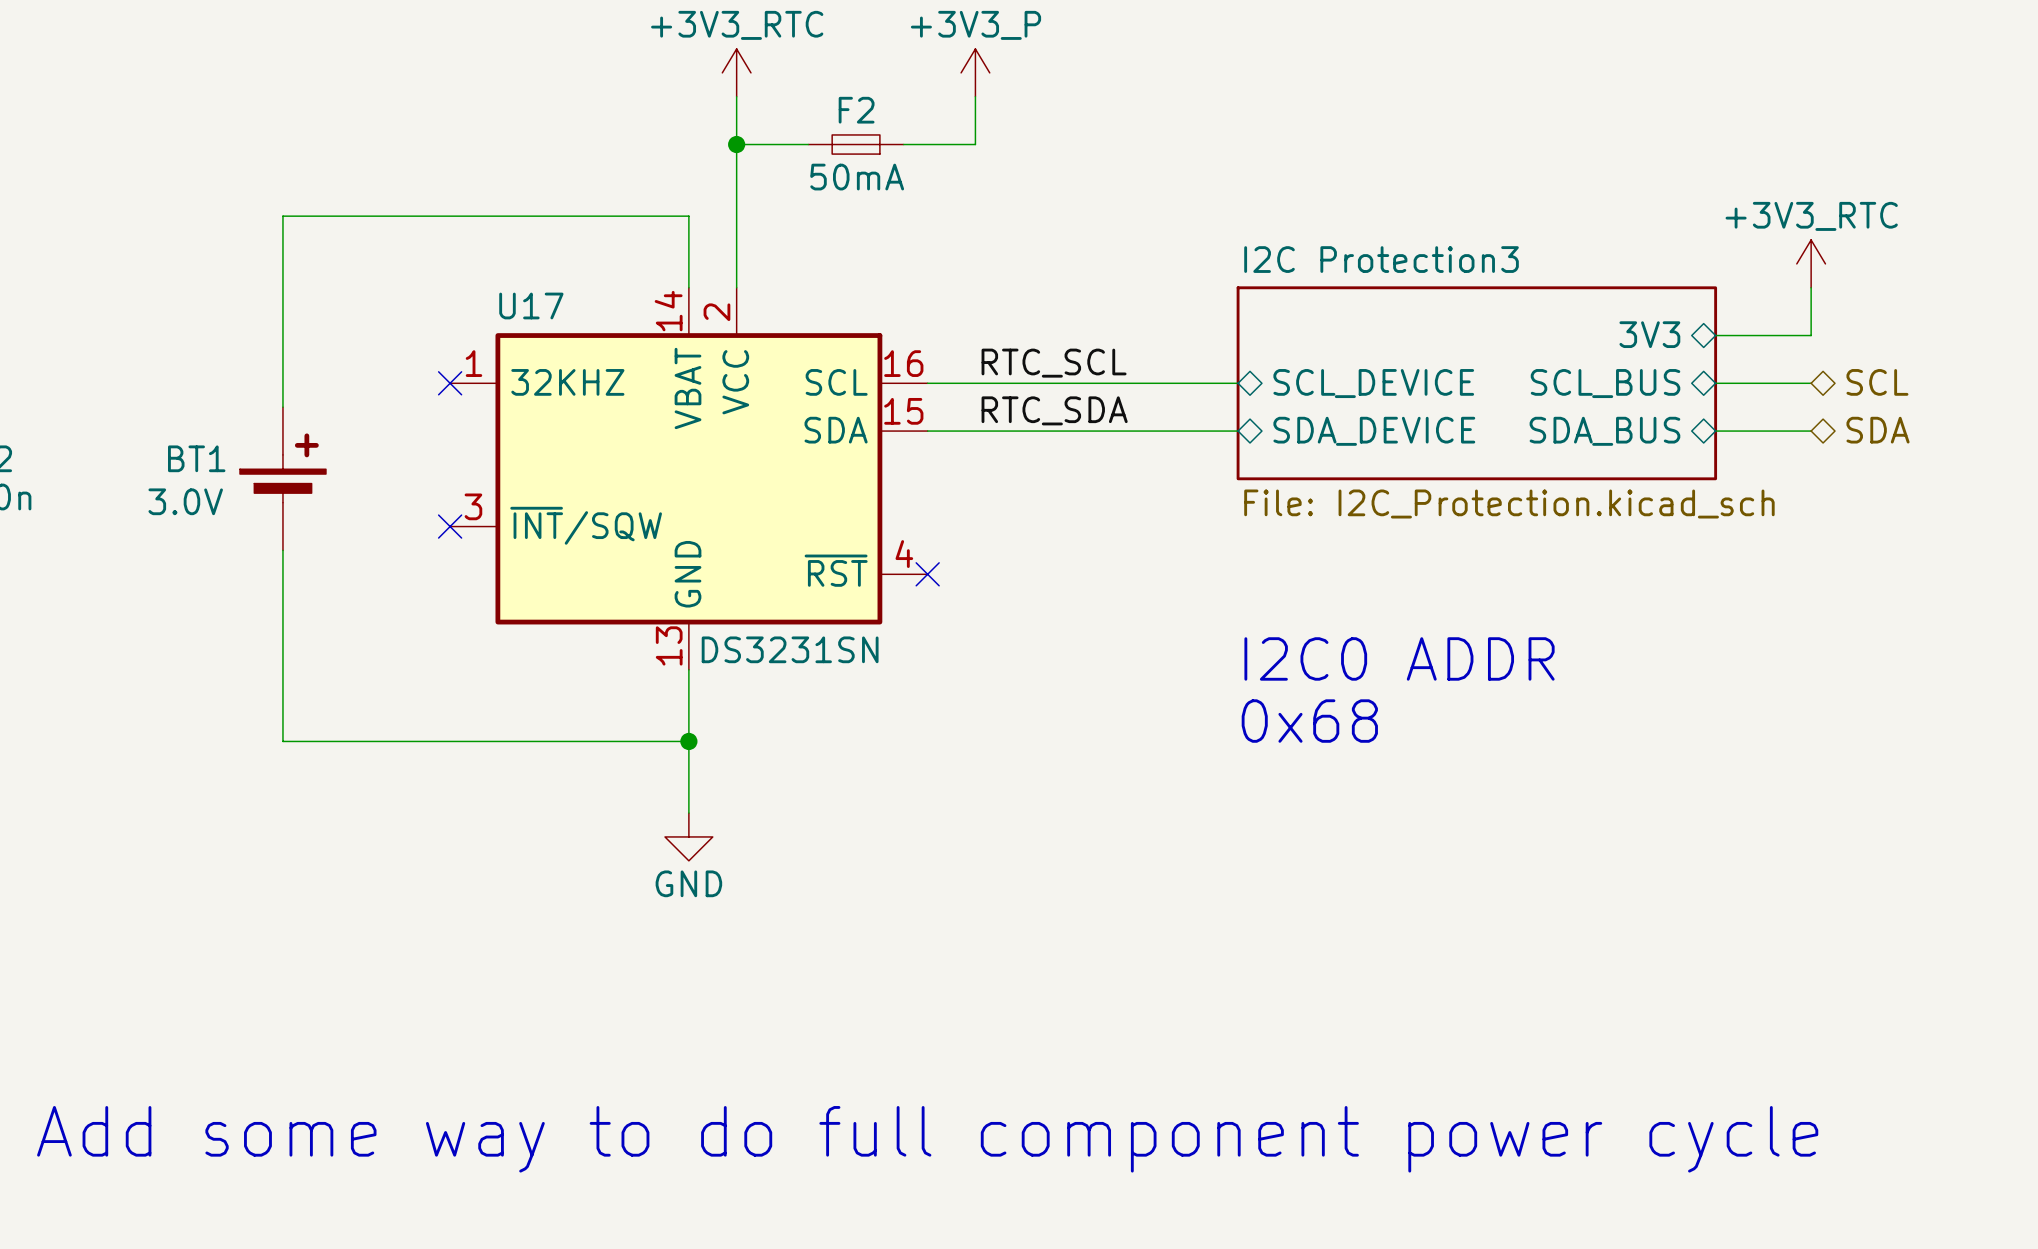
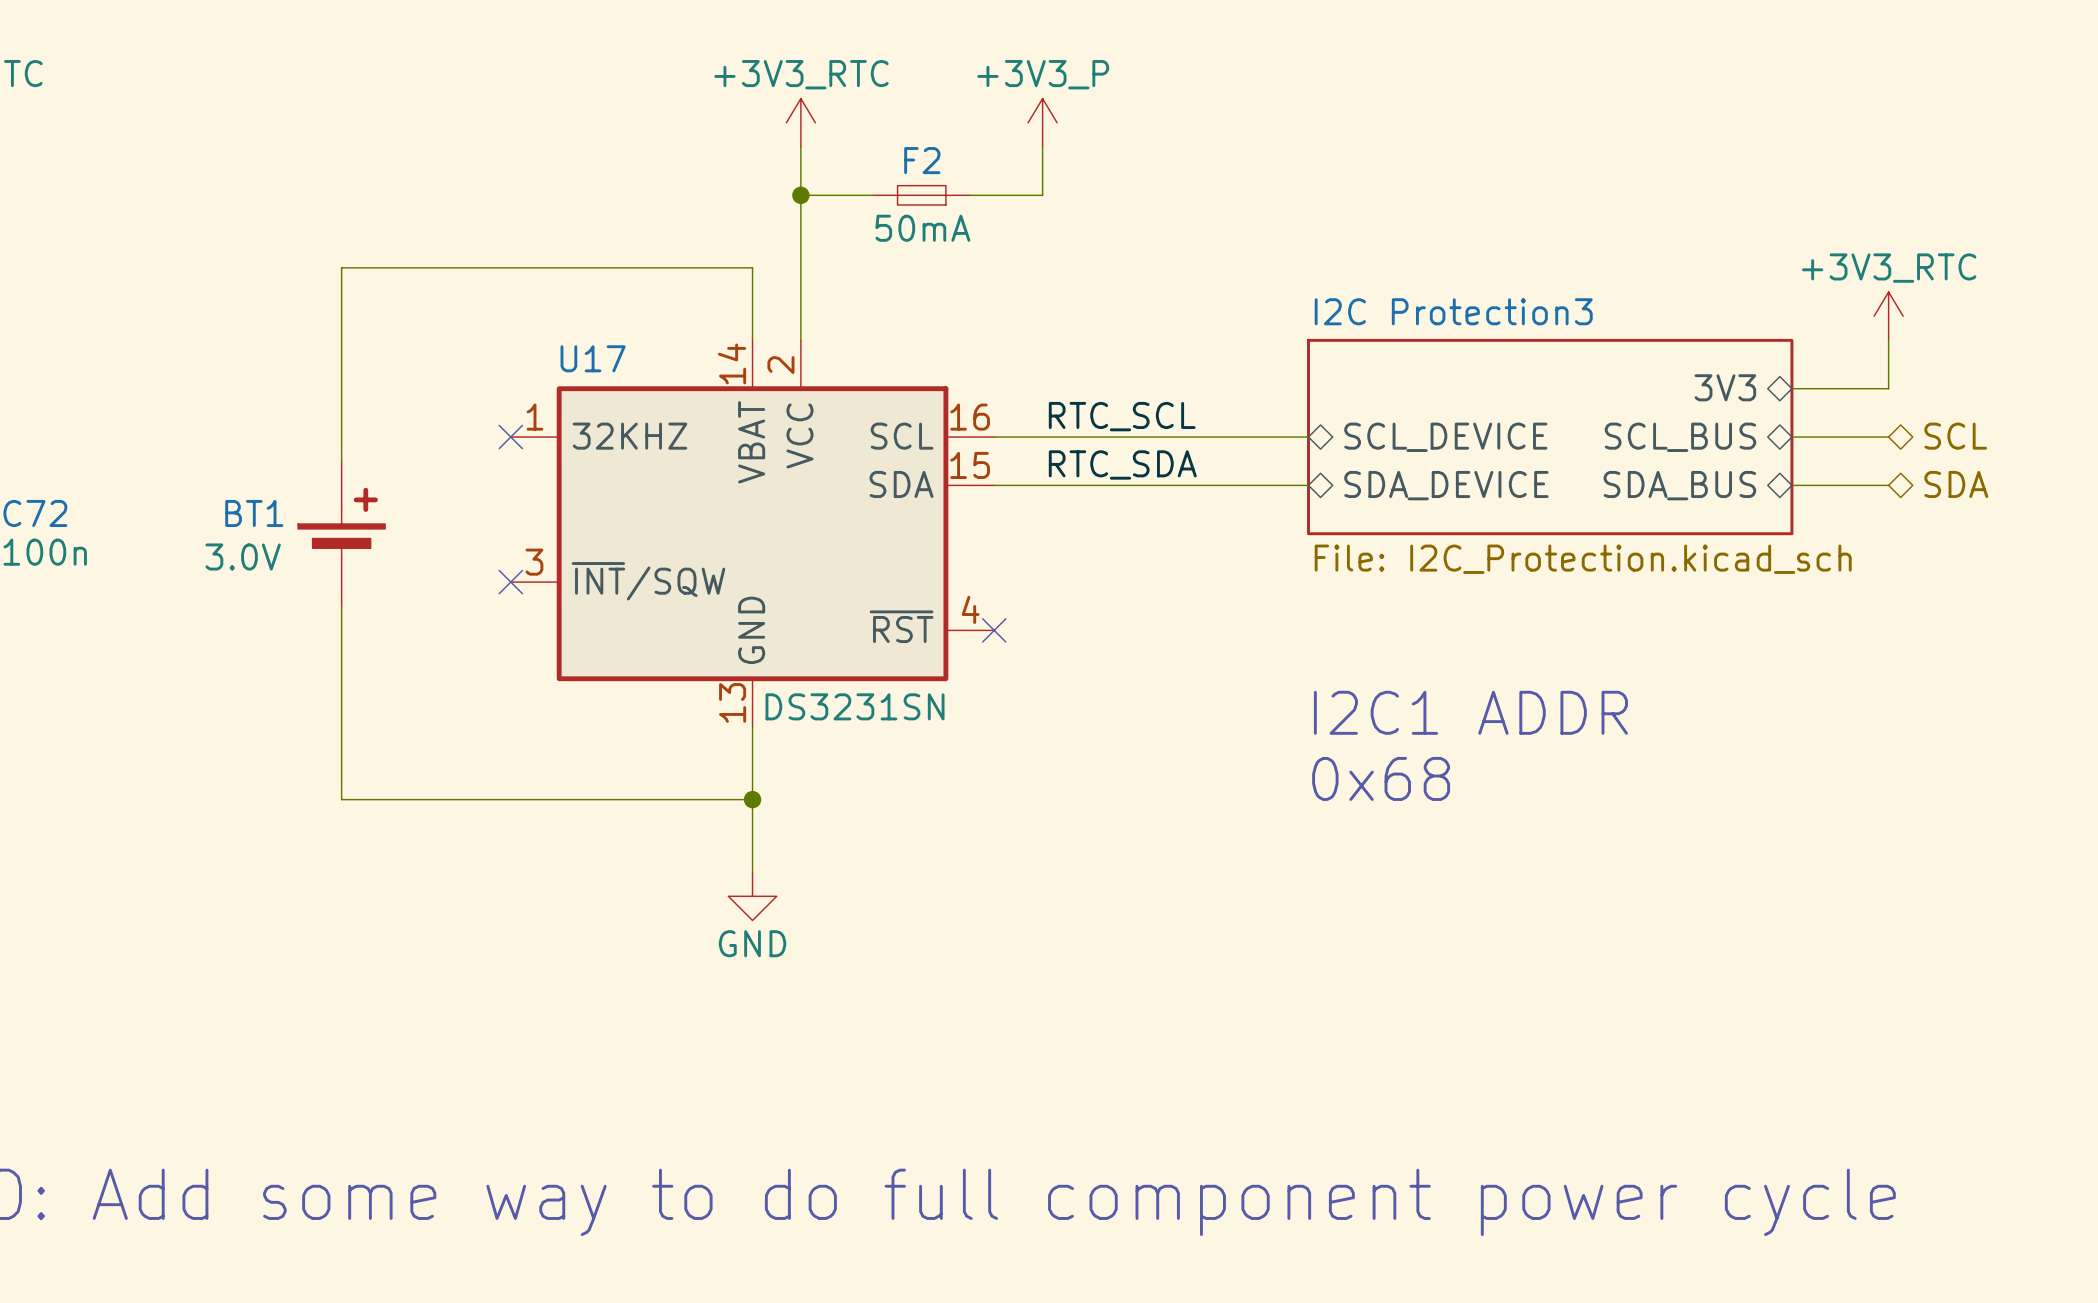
text: I2C0 ADDR (1399, 658) -> I2C1 ADDR (1470, 712)

